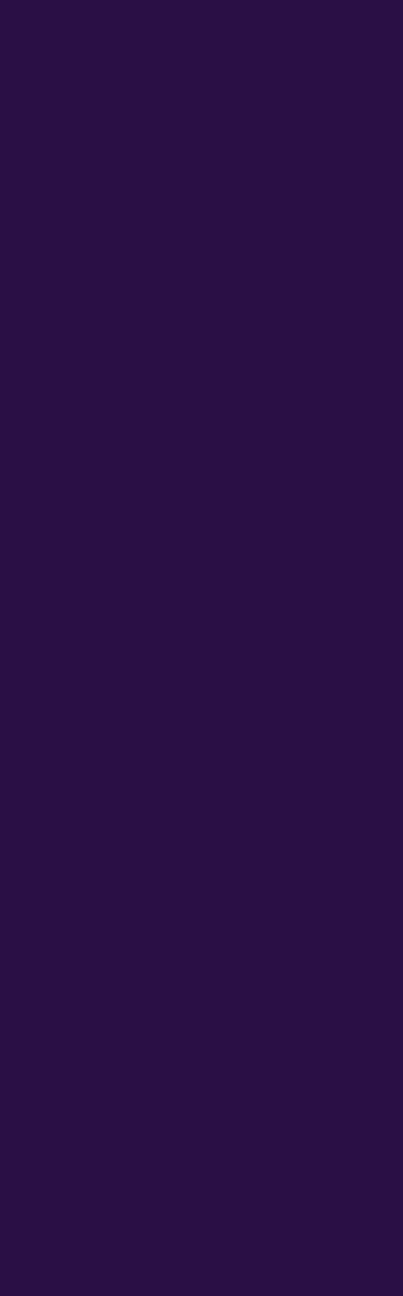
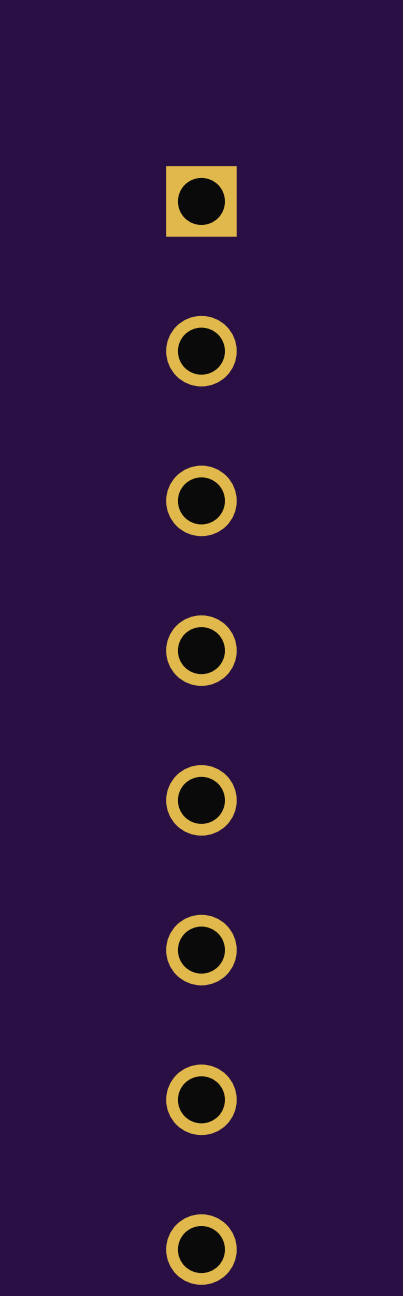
part: none -> (201, 725)

